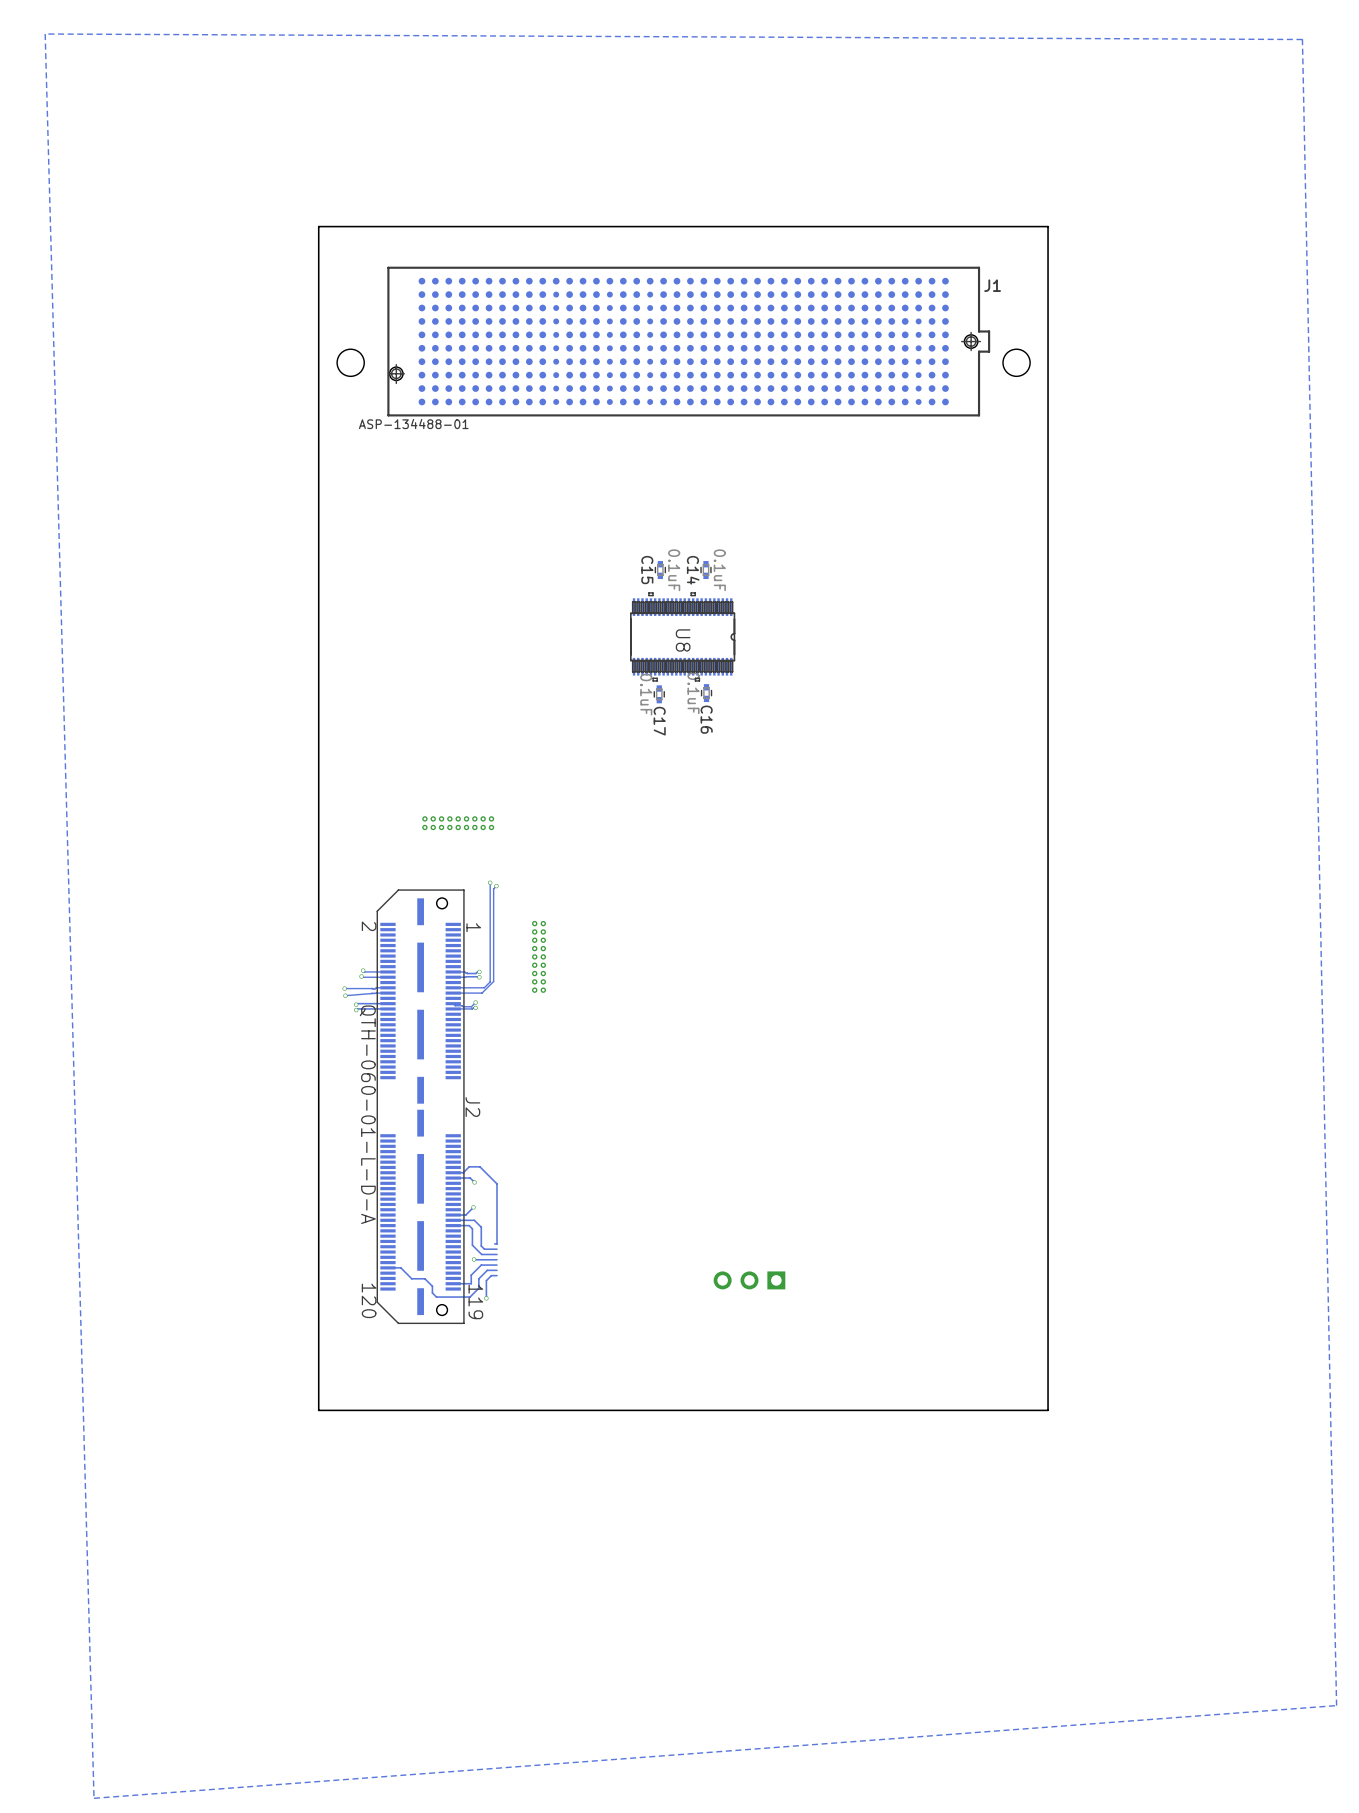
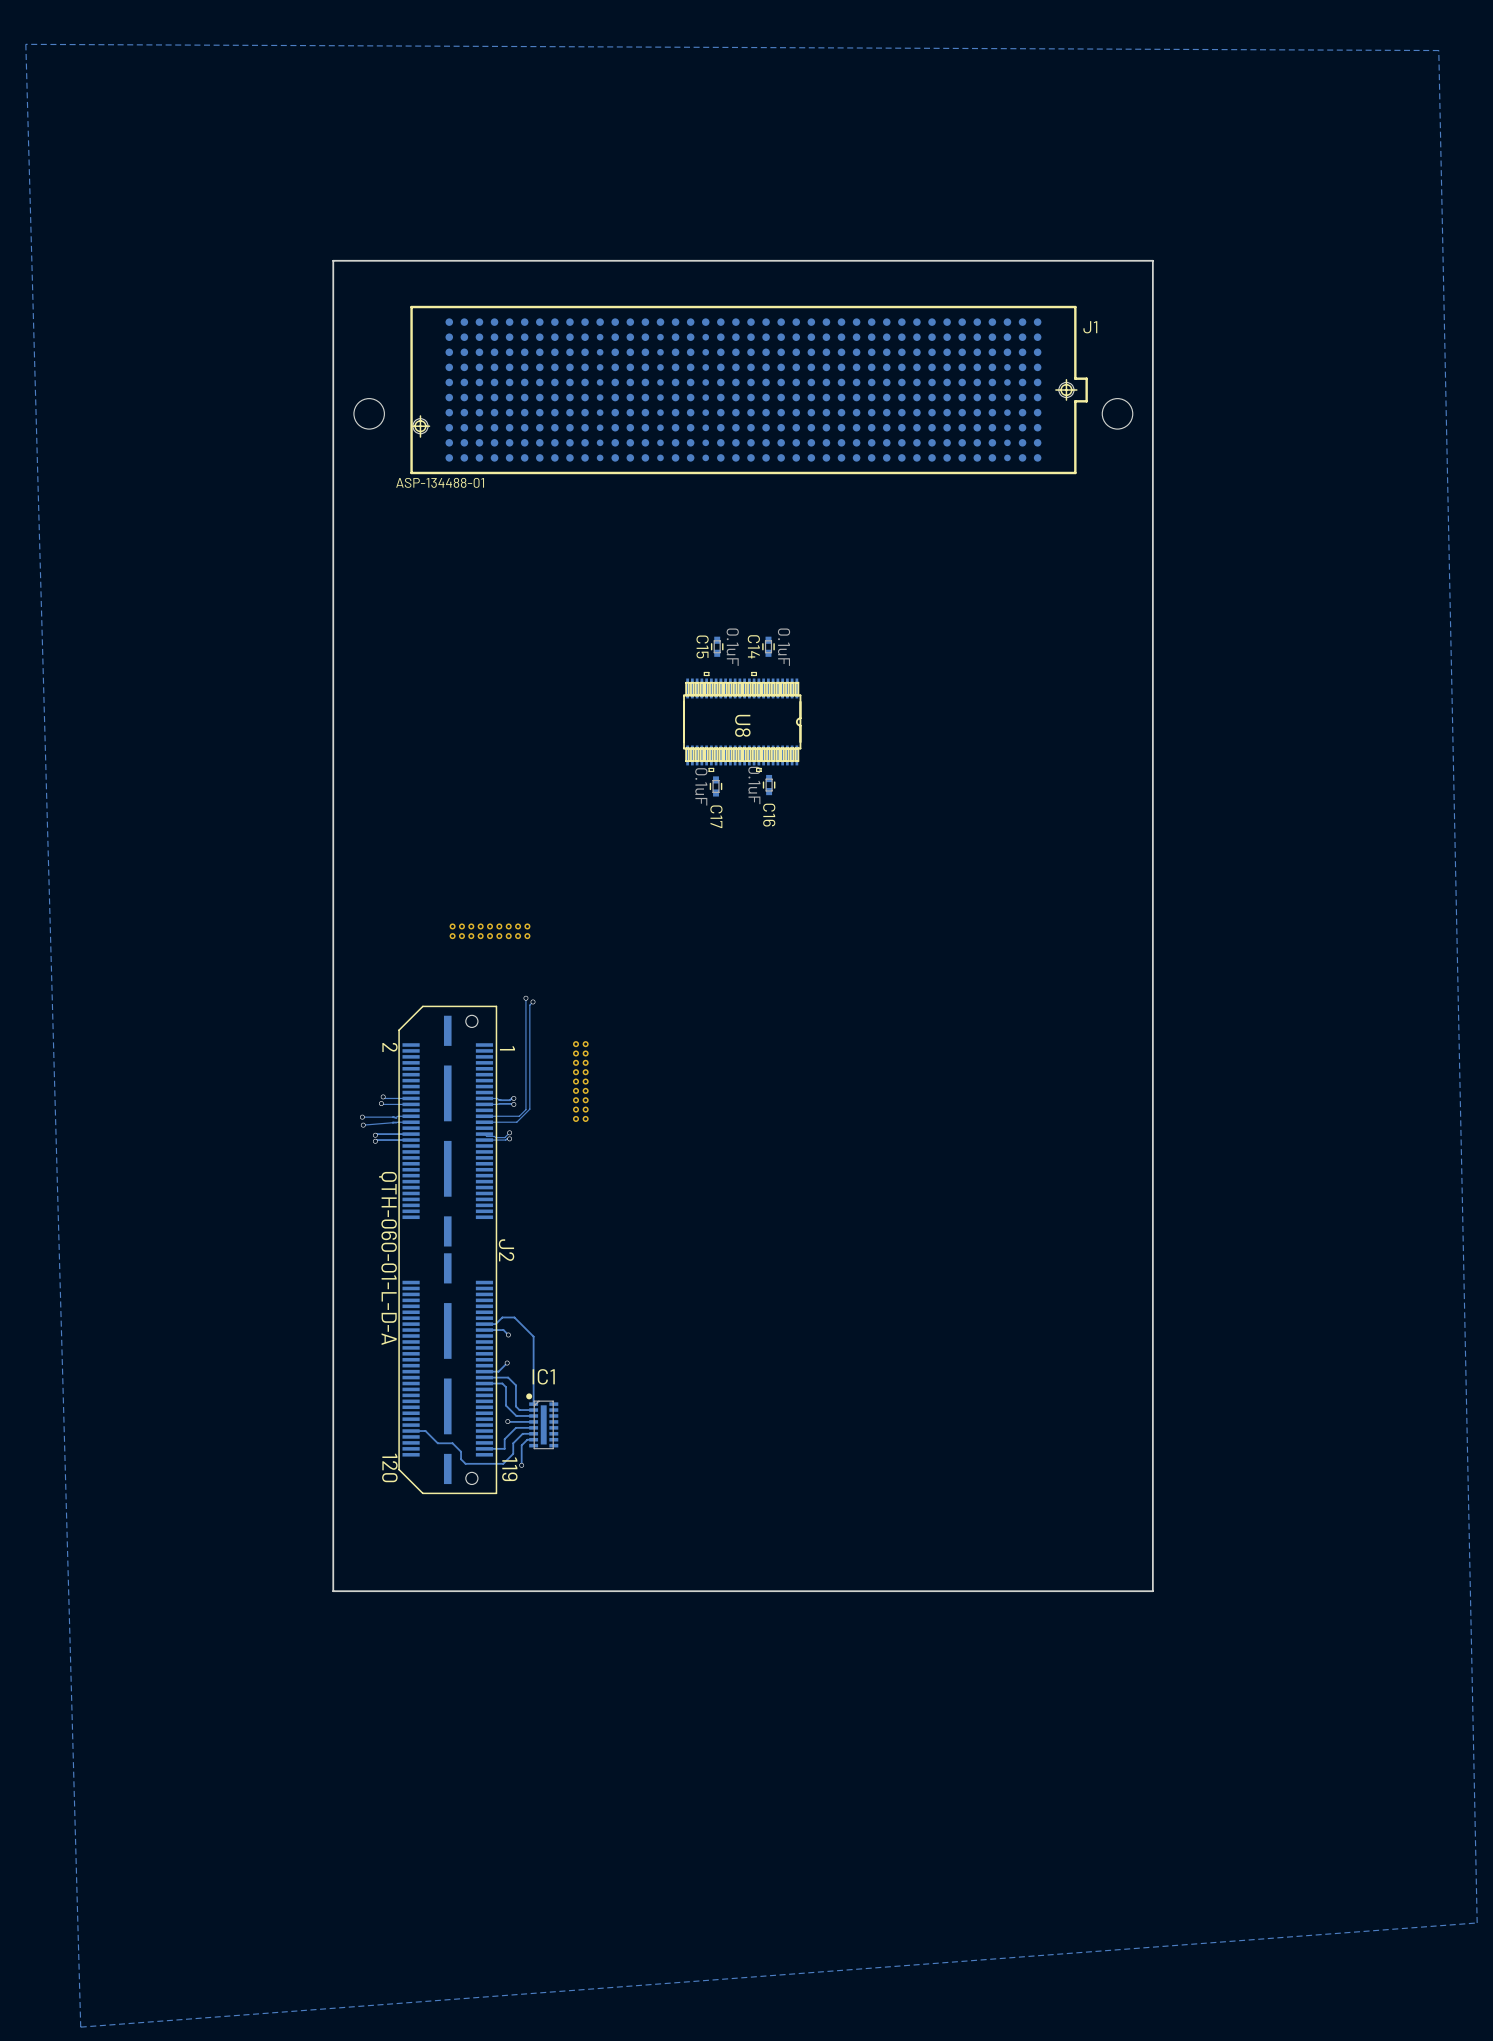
IC1: none -> (542, 1421)
part: (749, 1280) -> none

